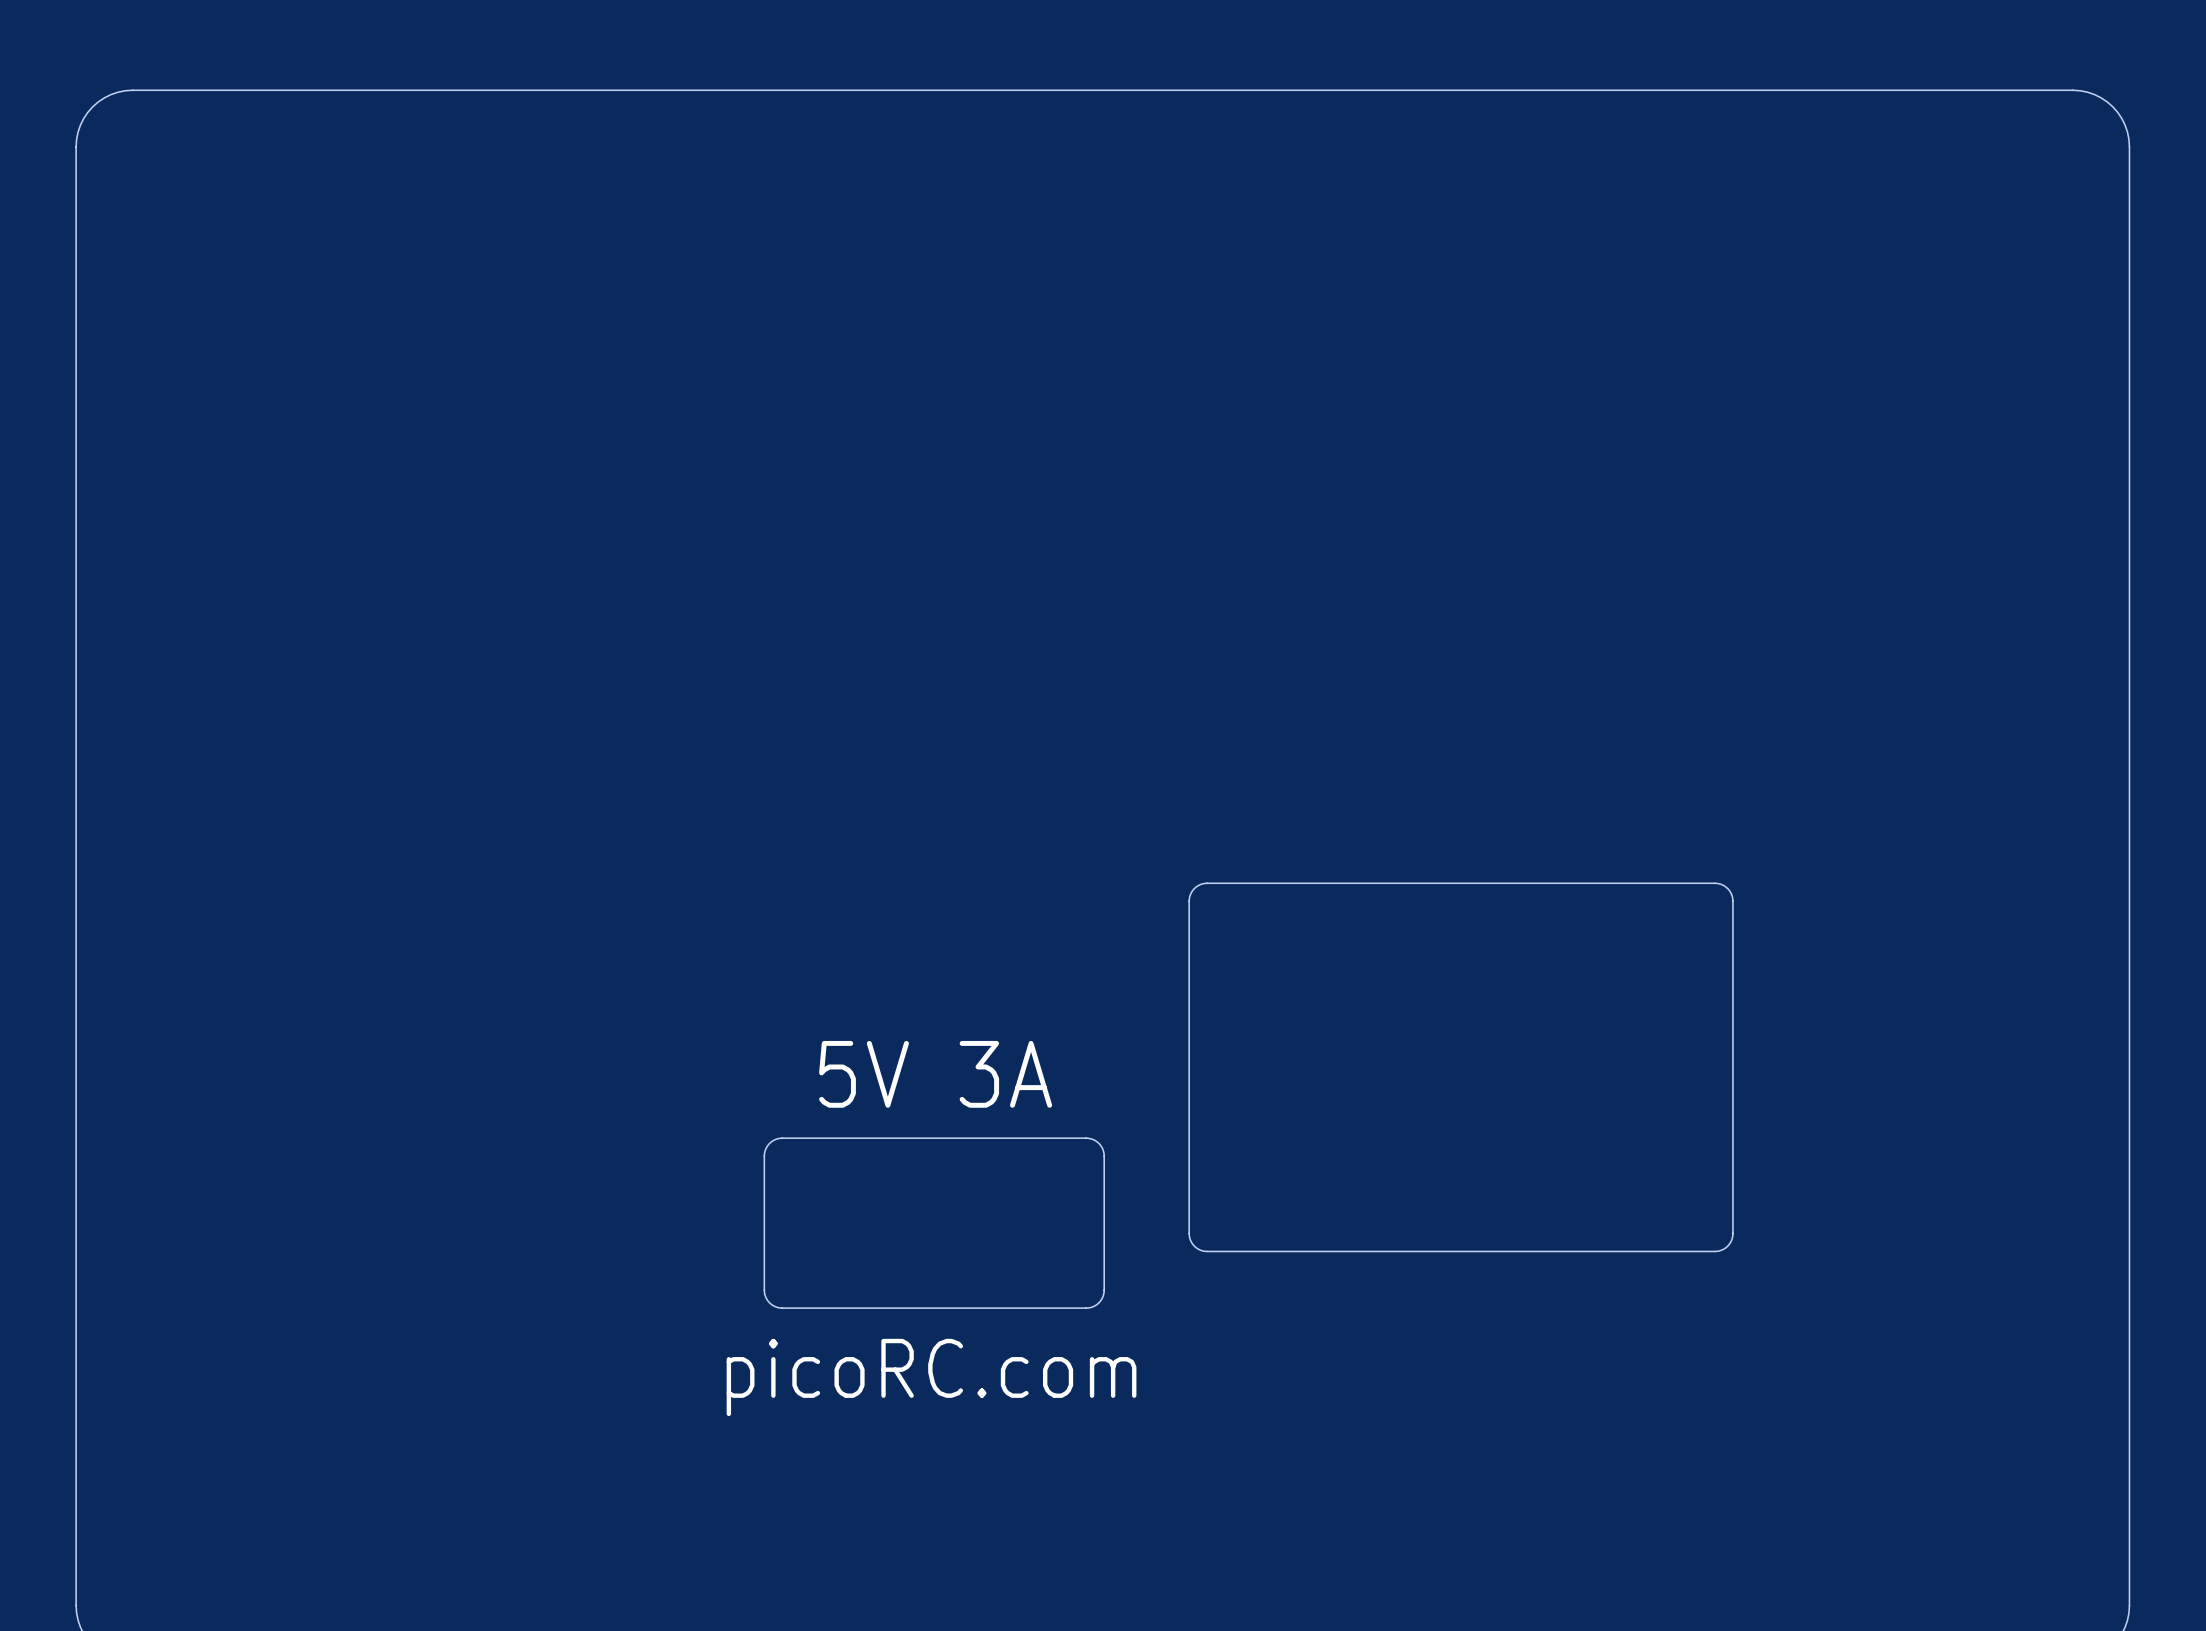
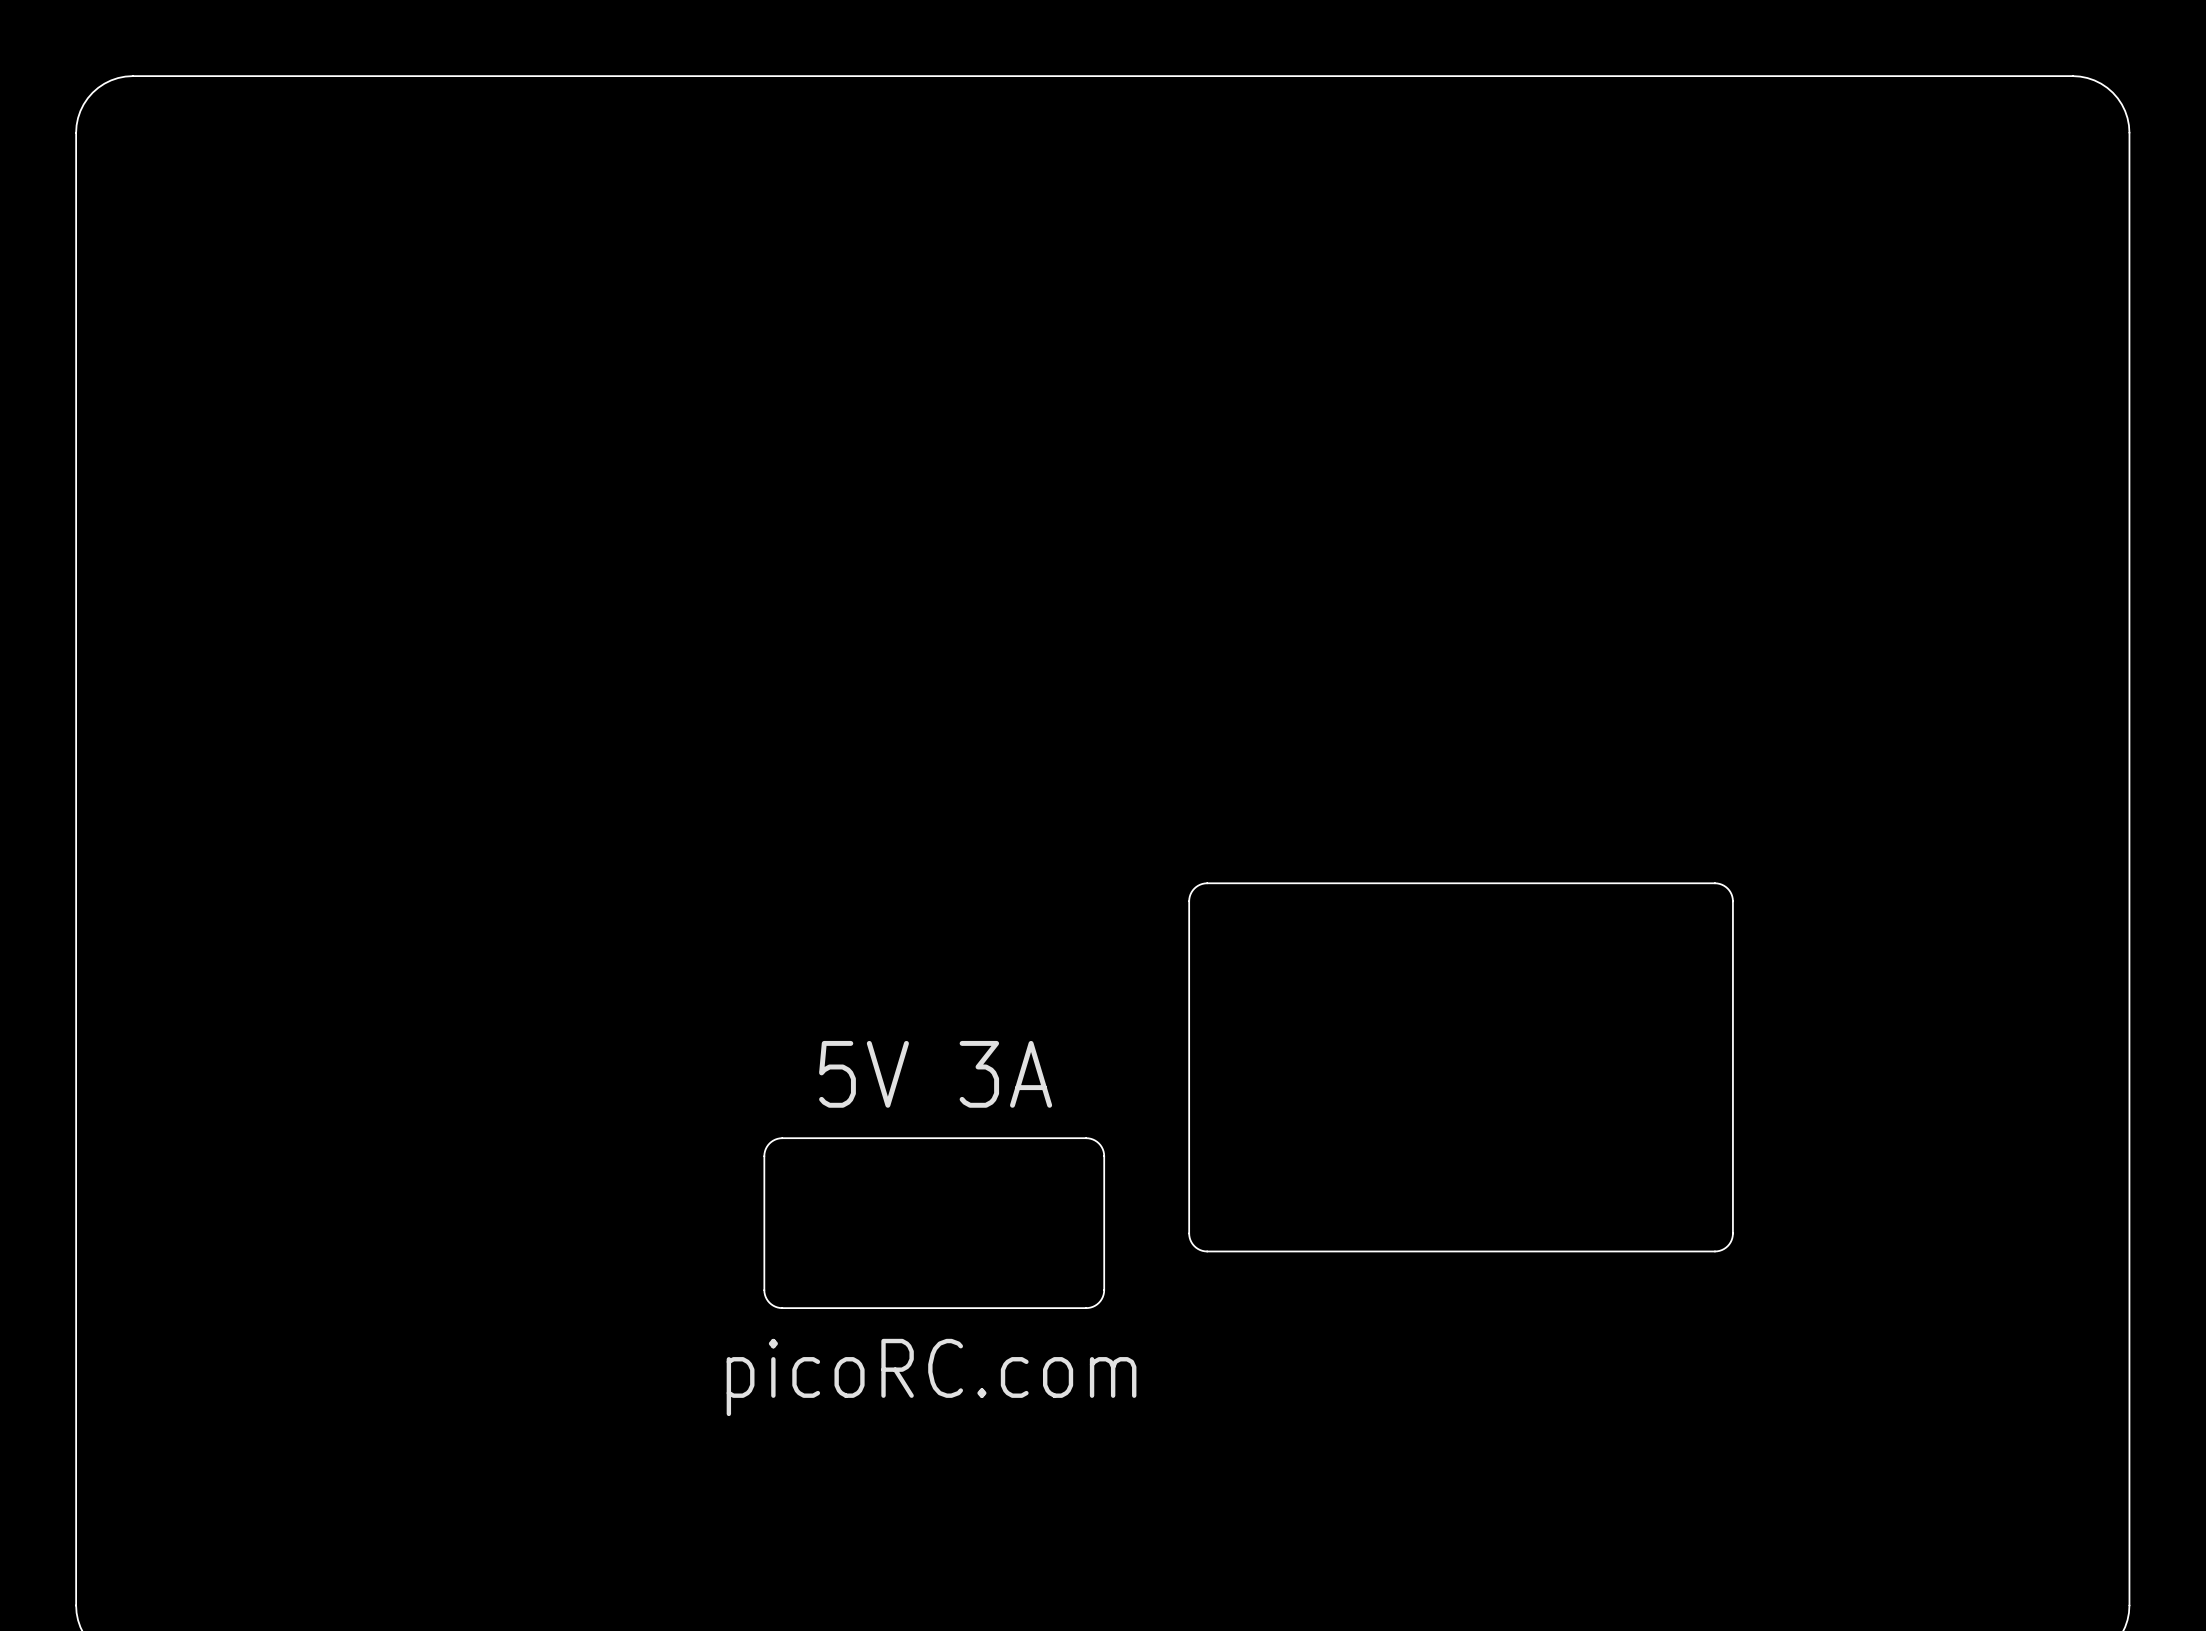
board edge: (2129, 146) (2125, 125) (2112, 106) (2094, 94) (2072, 90) (132, 90) (111, 94) (92, 106) (80, 125) (76, 146) -> (2129, 146) (2127, 118) (2117, 98) (2107, 87) (2094, 80) (2072, 76) (132, 76) (111, 80) (98, 87) (87, 98) (78, 118) (76, 146)

